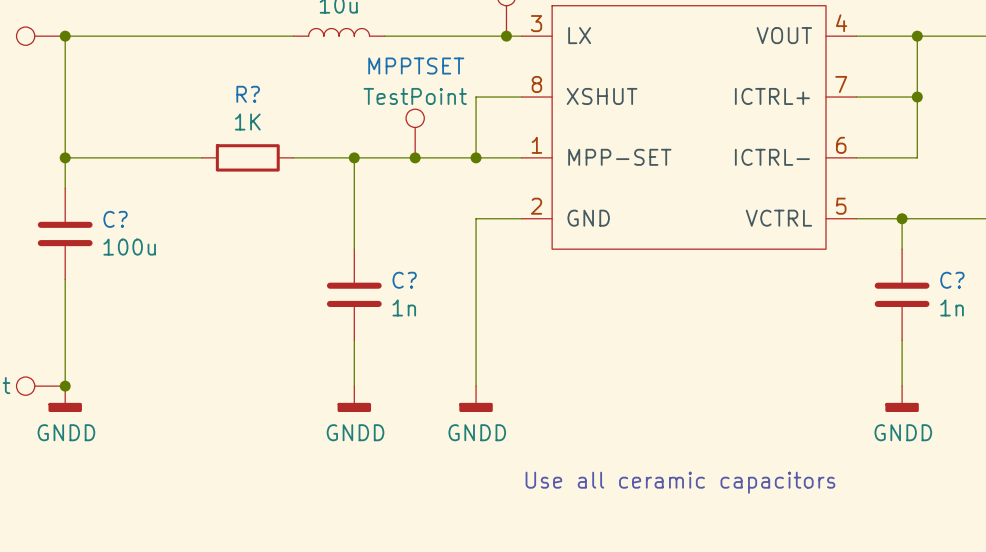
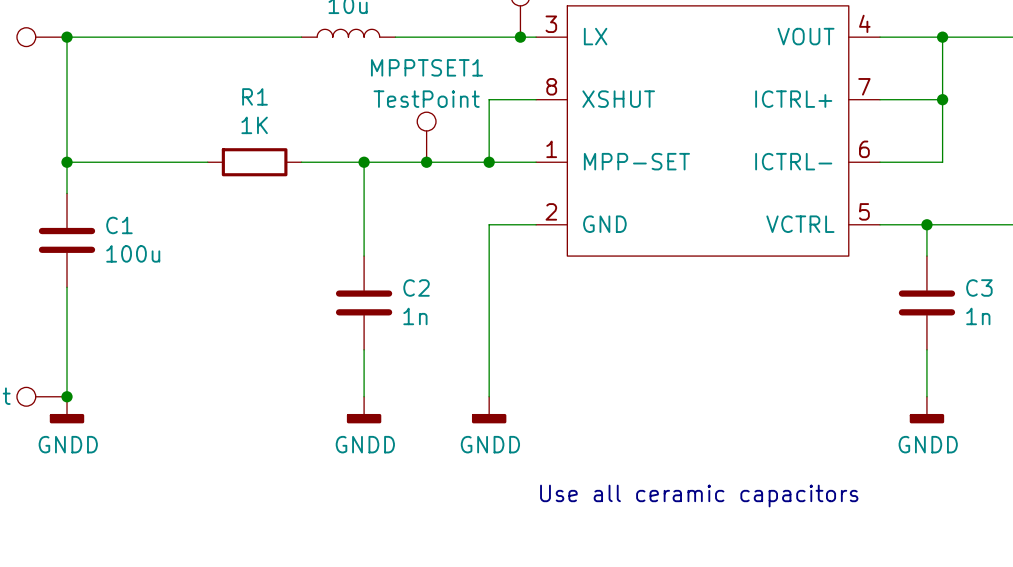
MPPTSET name: MPPTSET (416, 66) -> MPPTSET1 (426, 67)
R? name: R? (248, 94) -> R1 (255, 96)
C? name: C? (115, 219) -> C1 (119, 225)
C? name: C? (404, 280) -> C2 (416, 287)
C? name: C? (952, 280) -> C3 (979, 287)

